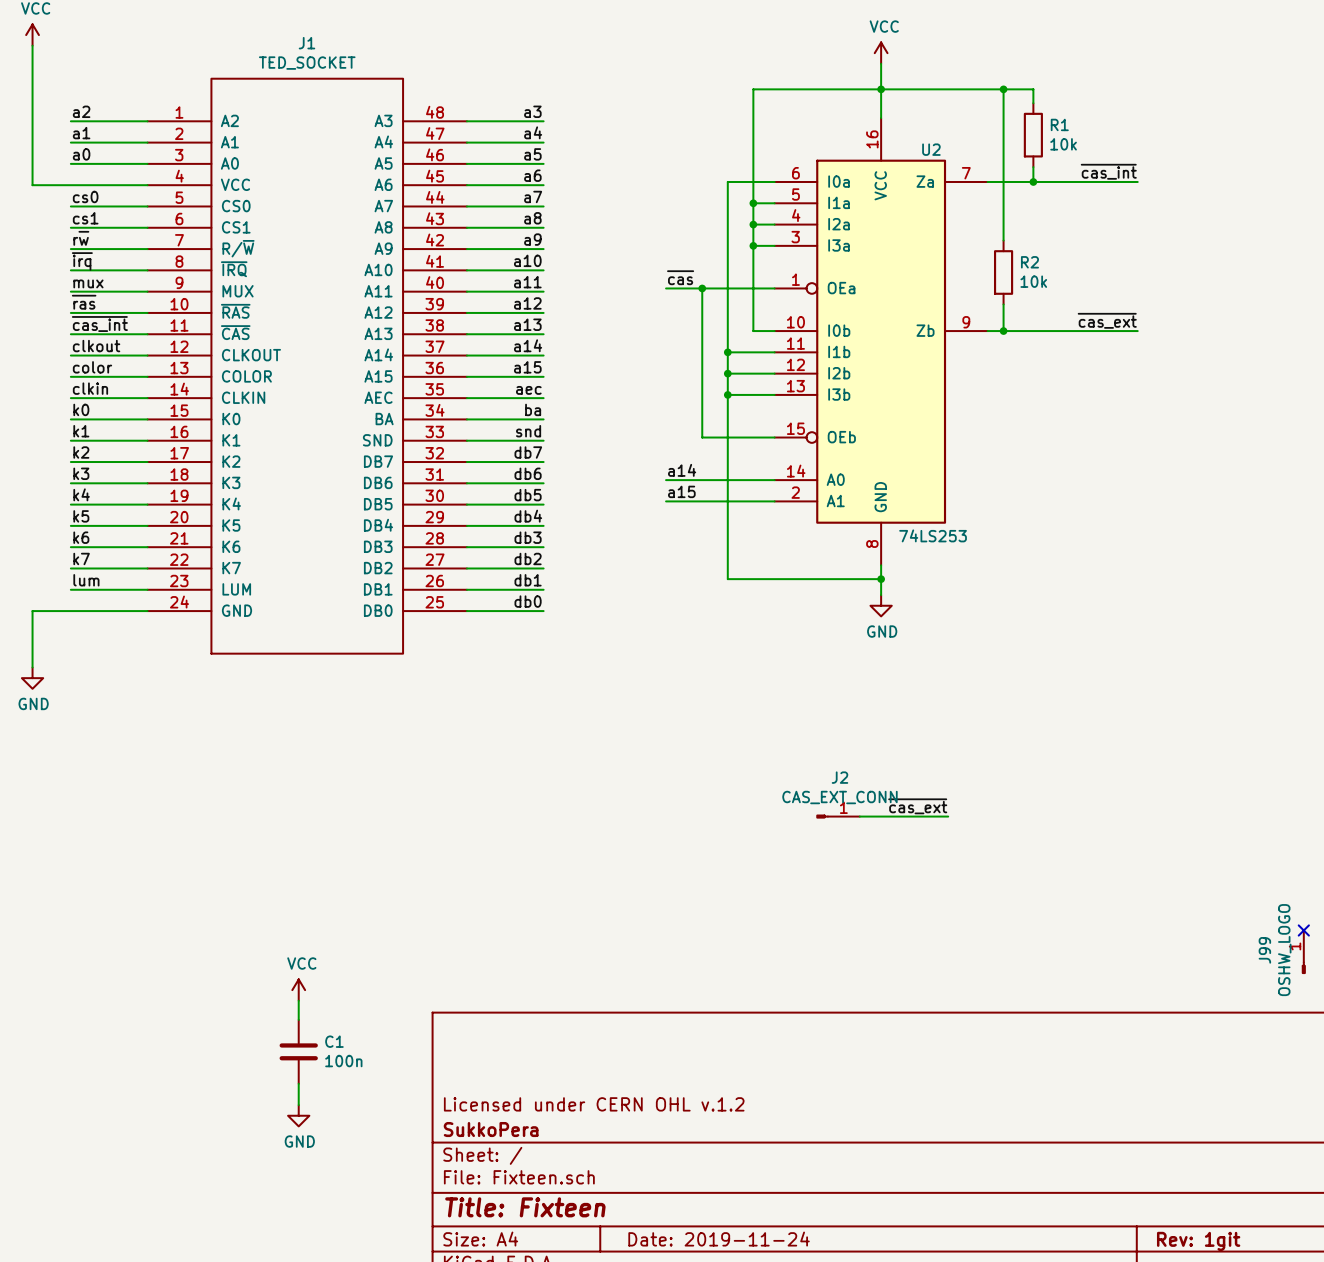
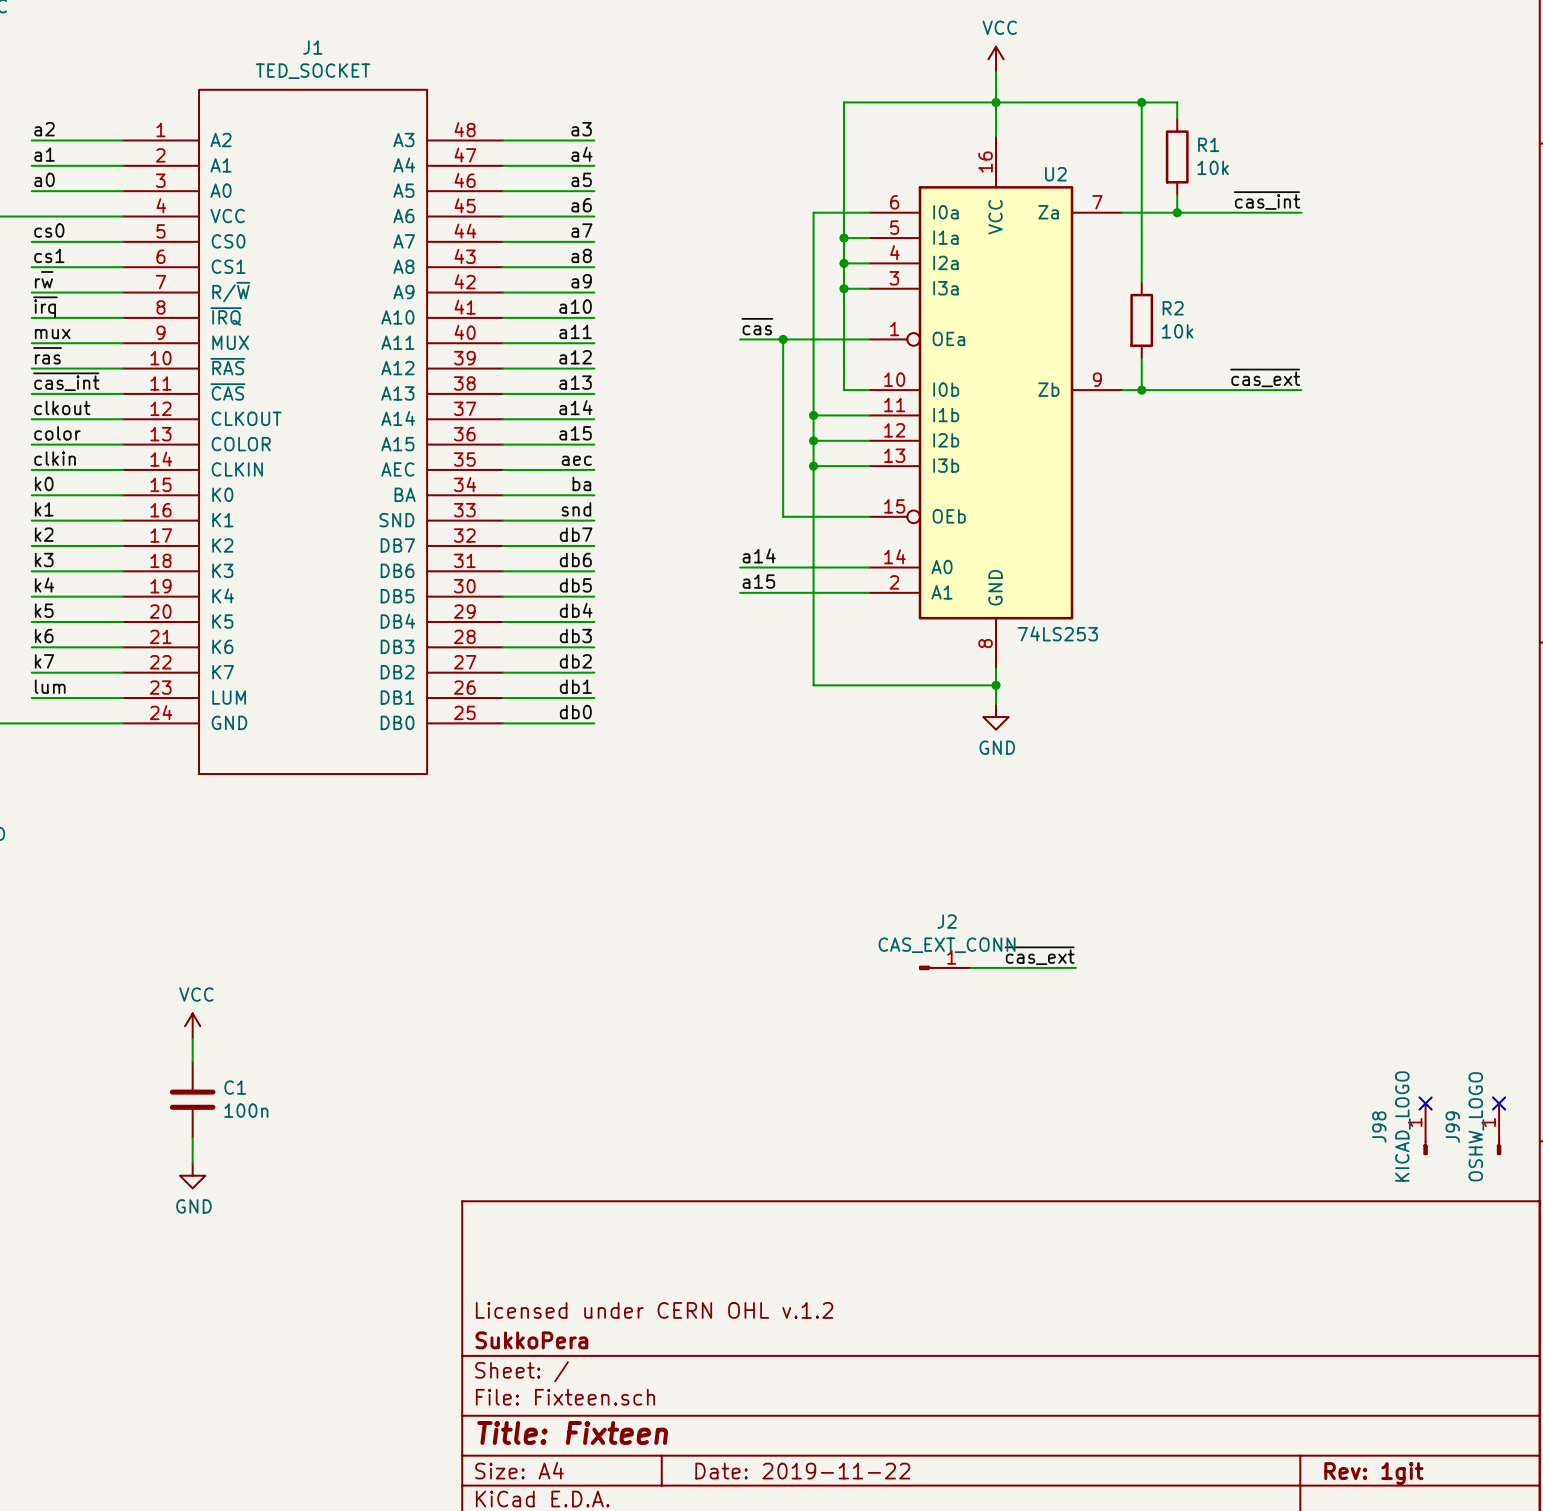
no-connect mark: none -> (1425, 1103)
J98: none -> KICAD_LOGO (1425, 1129)
power symbol position: VCC (298, 990) -> VCC (192, 1026)
wire: (298, 1000) (298, 1019) -> (192, 1038) (192, 1061)
C1 position: (298, 1051) -> (192, 1099)
wire: (298, 1083) (298, 1105) -> (192, 1137) (192, 1163)
power symbol position: GND (298, 1115) -> GND (192, 1175)
title block: Date: 2019-11-24 (719, 1239) -> Date: 2019-11-22 (802, 1471)

